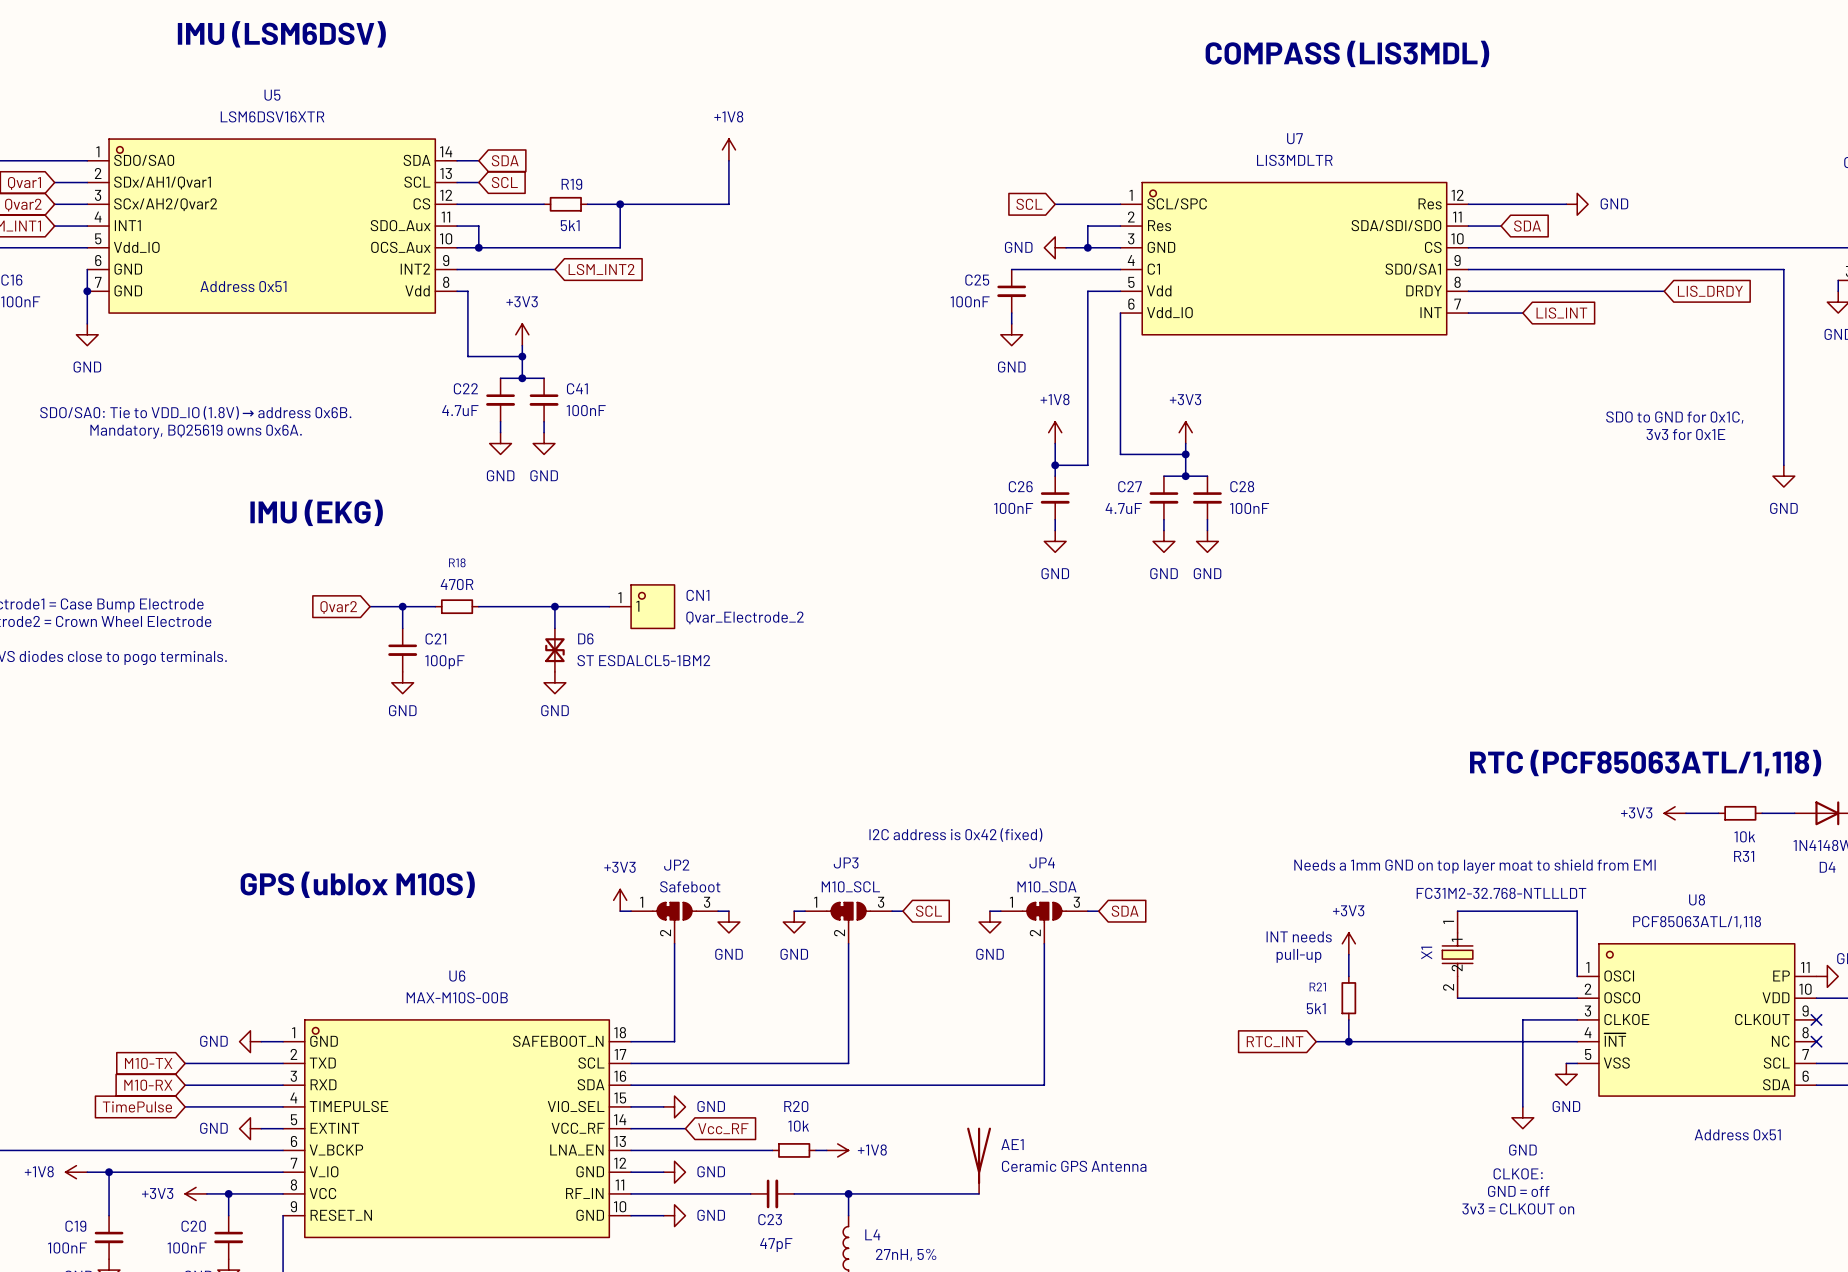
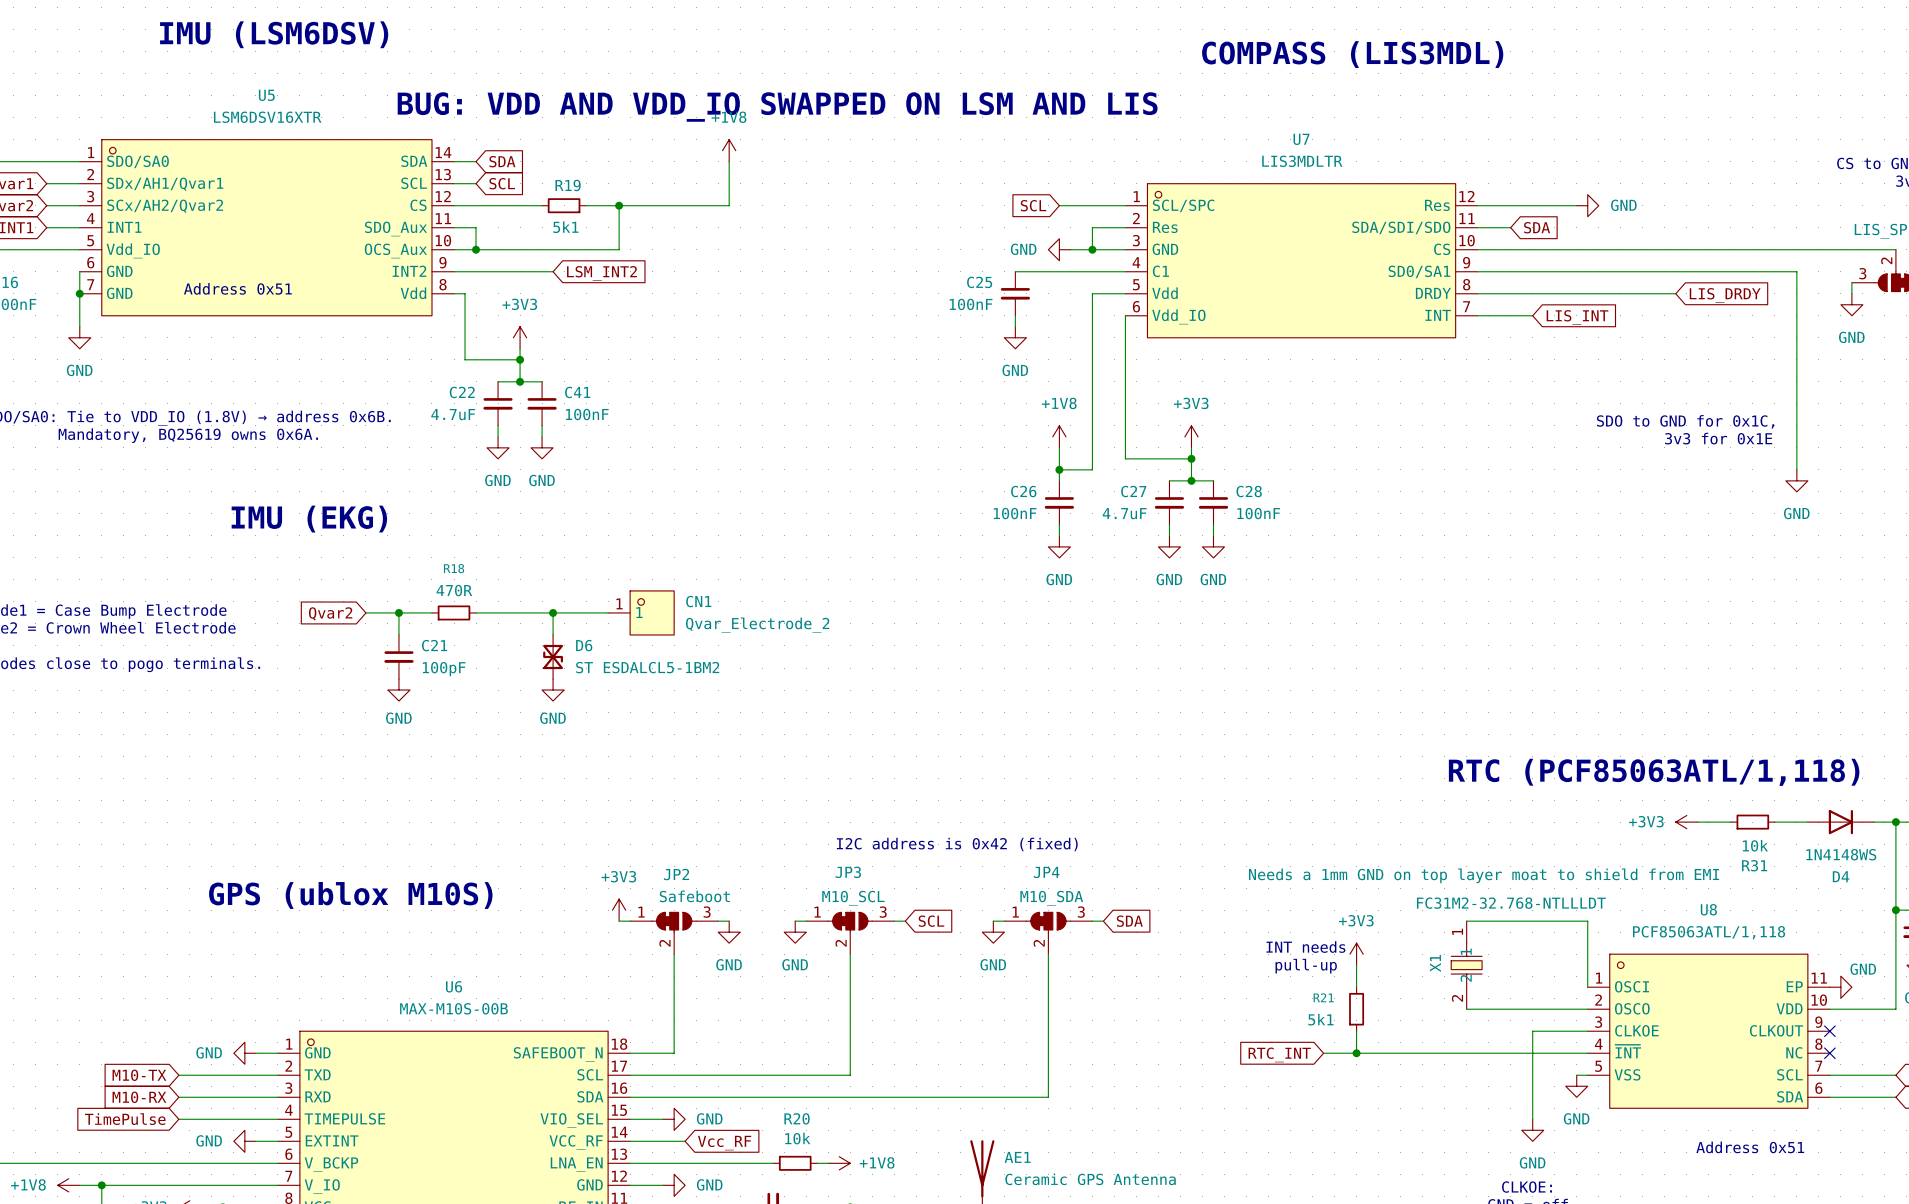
text: none -> BUG: VDD AND VDD_IO SWAPPED ON LSM AND LIS (777, 107)

